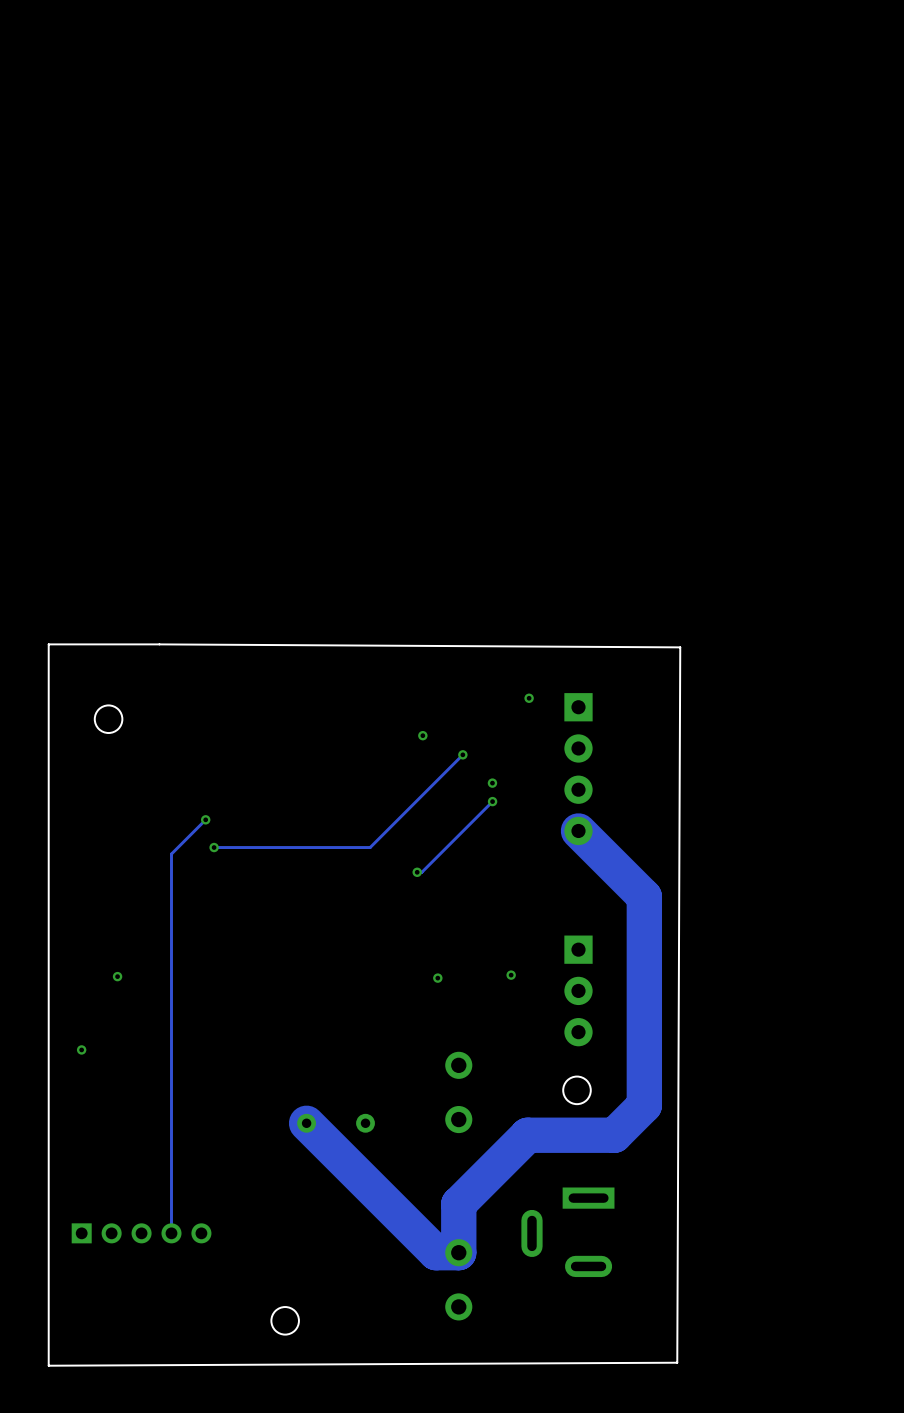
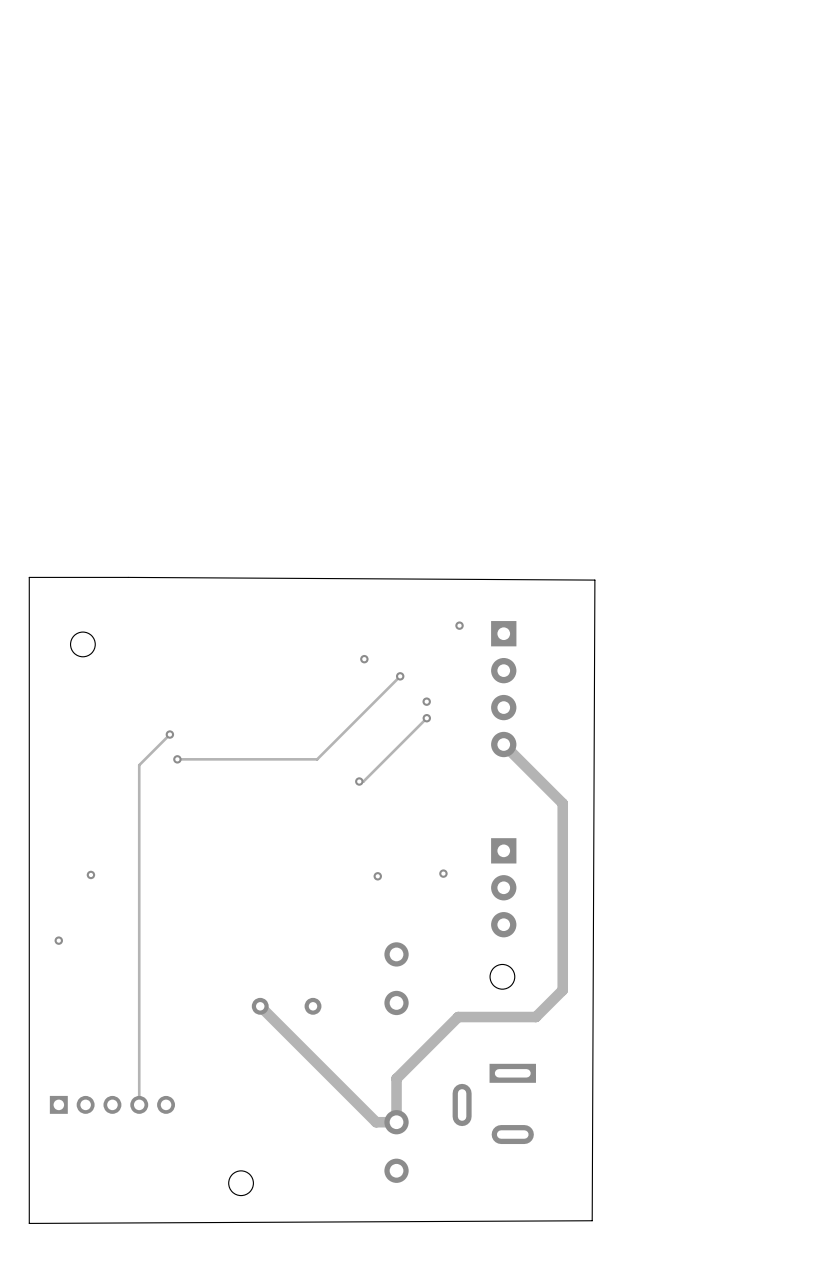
track width: thick (578, 830) (644, 896) (644, 1105) (614, 1135) (527, 1135) (458, 1204) (458, 1252) (436, 1252) (306, 1123) -> thin (503, 744) (562, 803) (562, 990) (535, 1017) (458, 1017) (396, 1078) (396, 1122) (376, 1122) (260, 1006)

